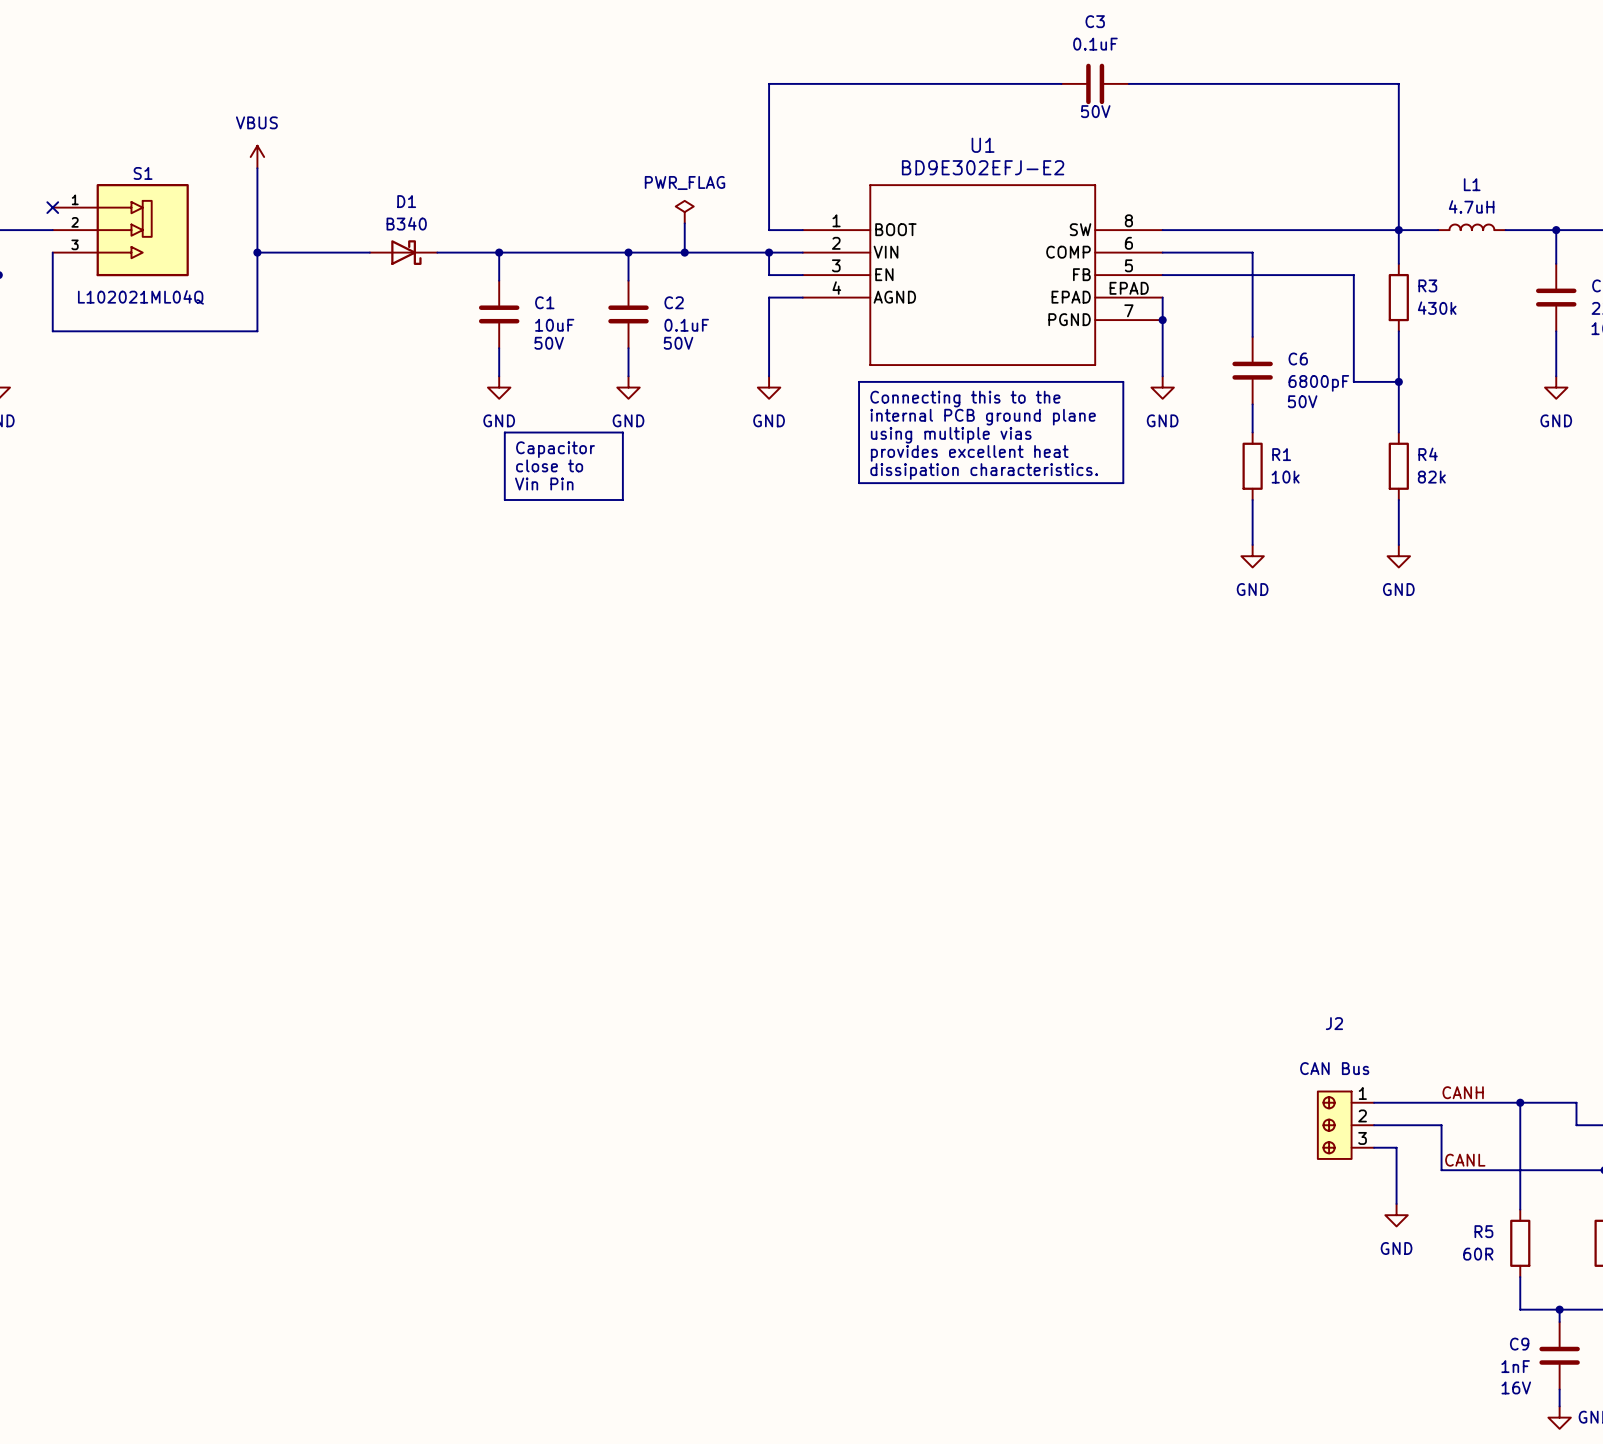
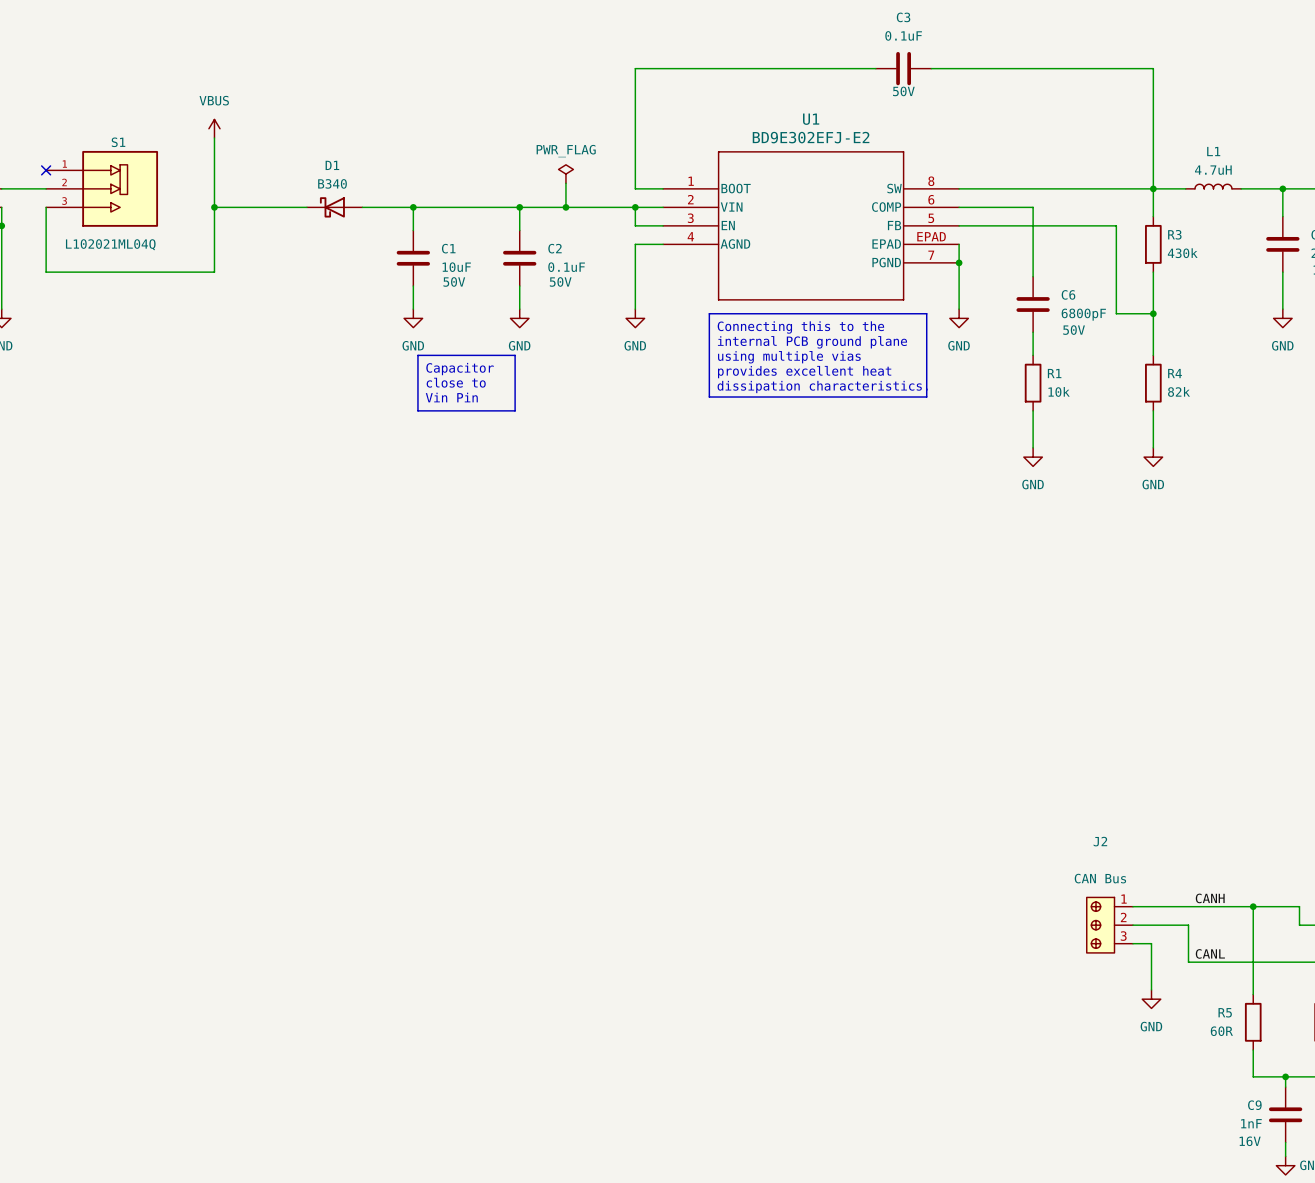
D1 rotation: 0° (406, 252) -> 180° (332, 207)

